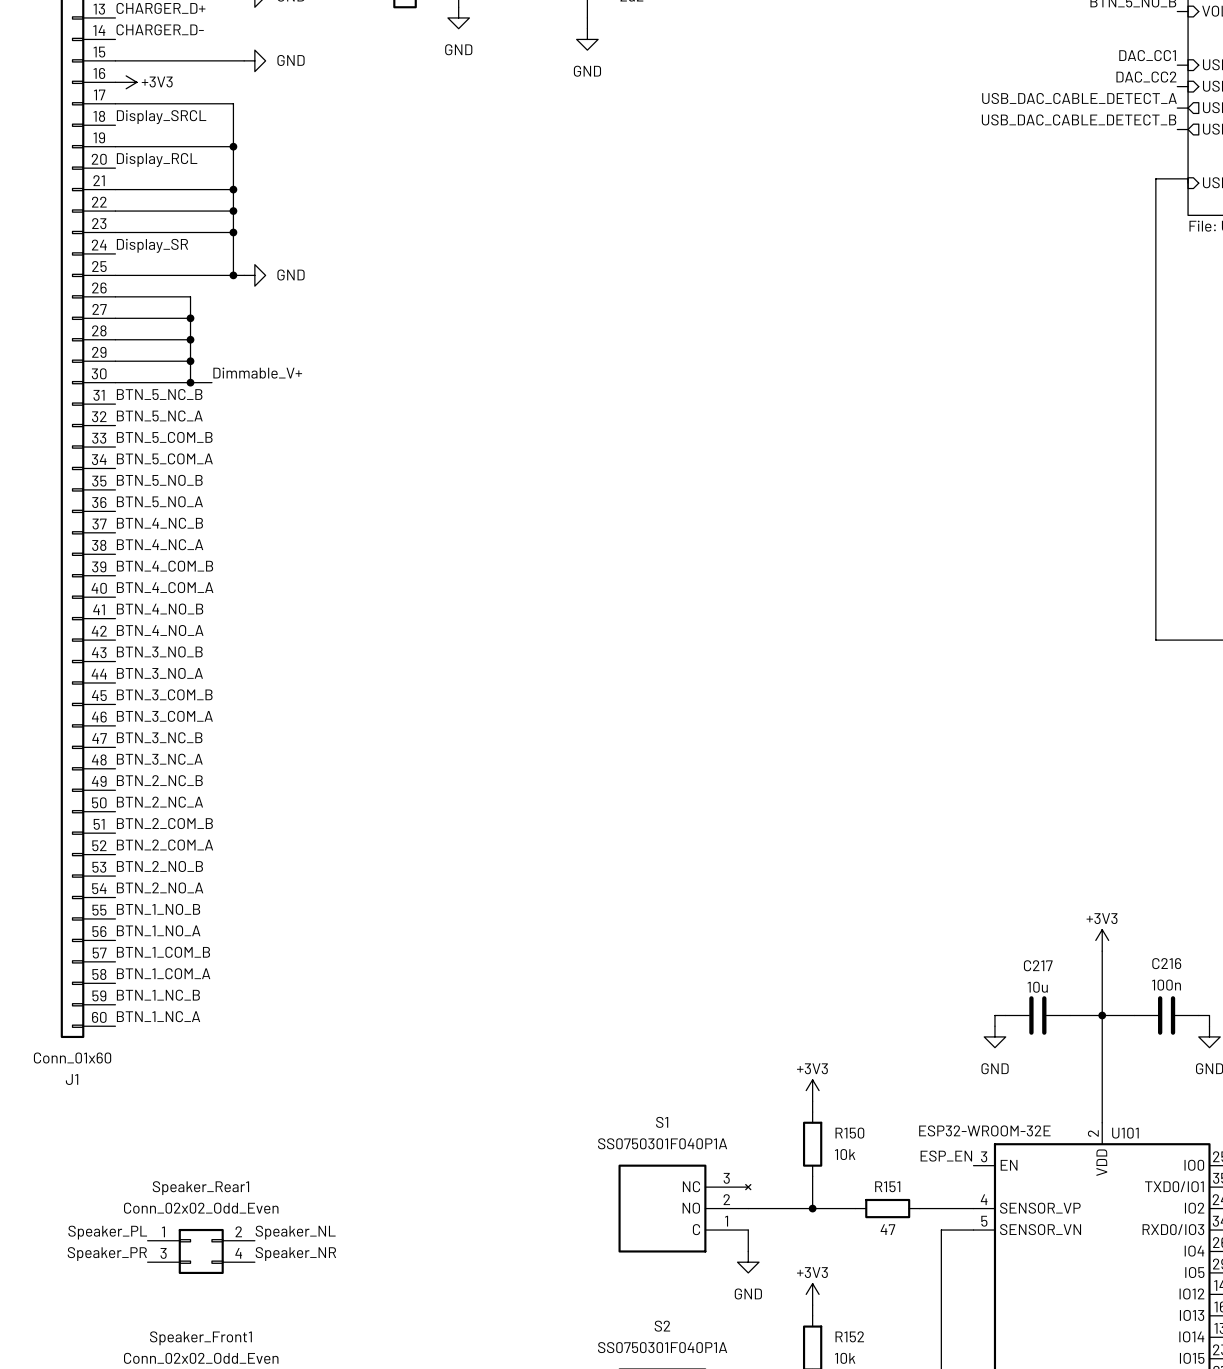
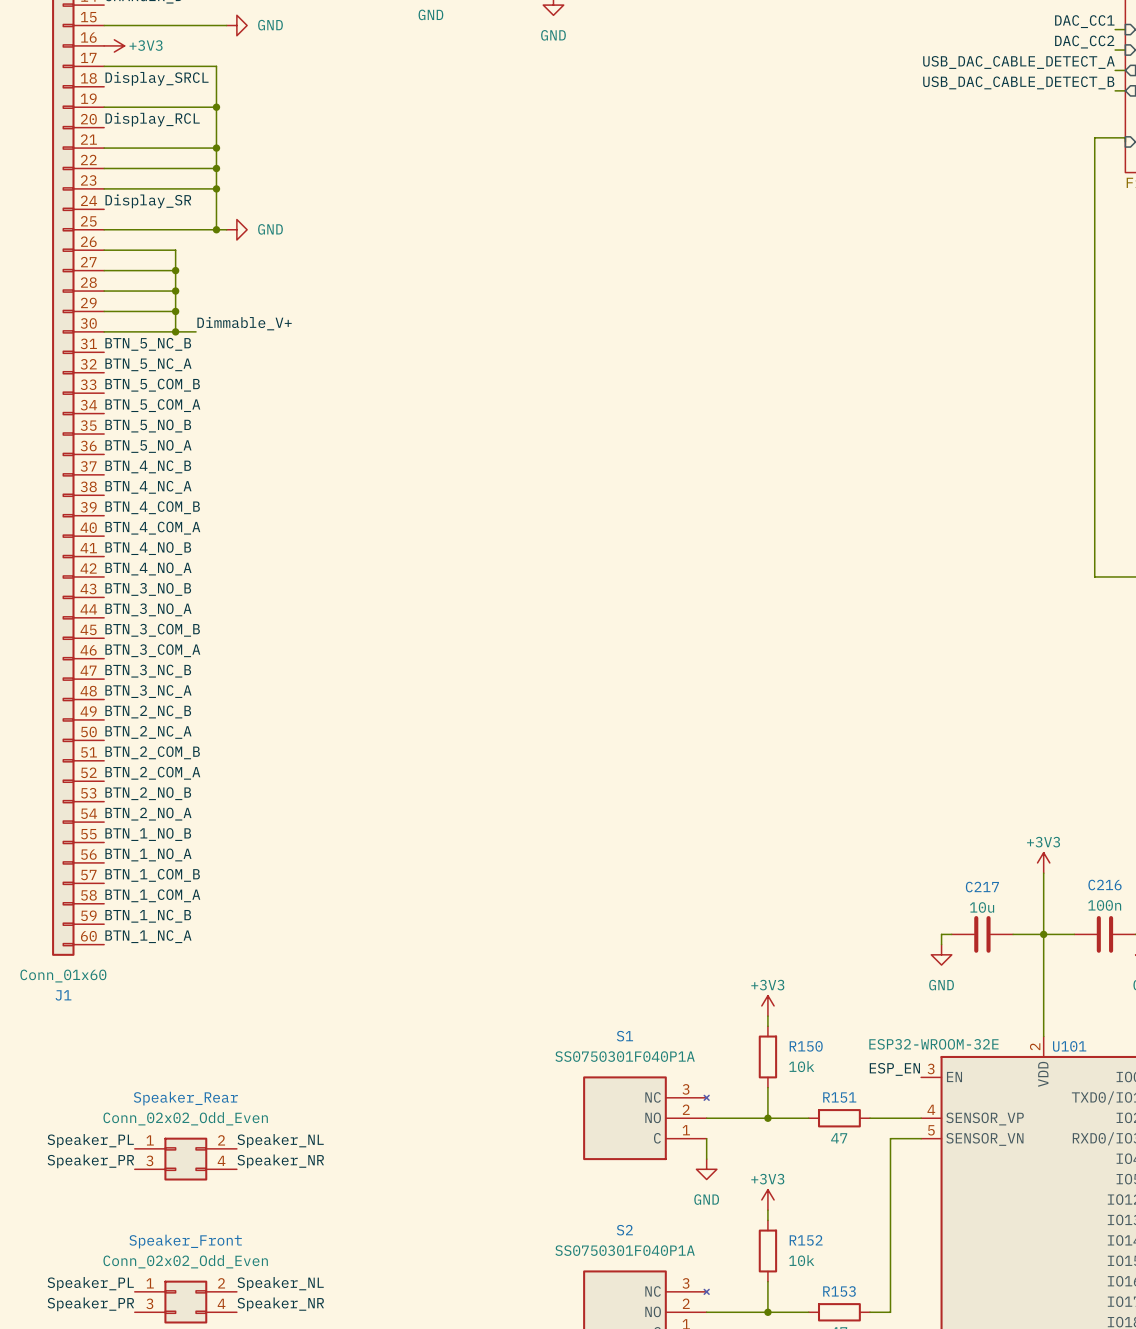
Speaker_Rear1 name: Speaker_Rear1 (200, 1188) -> Speaker_Rear (185, 1098)
Speaker_Front1 name: Speaker_Front1 (200, 1338) -> Speaker_Front (185, 1241)

